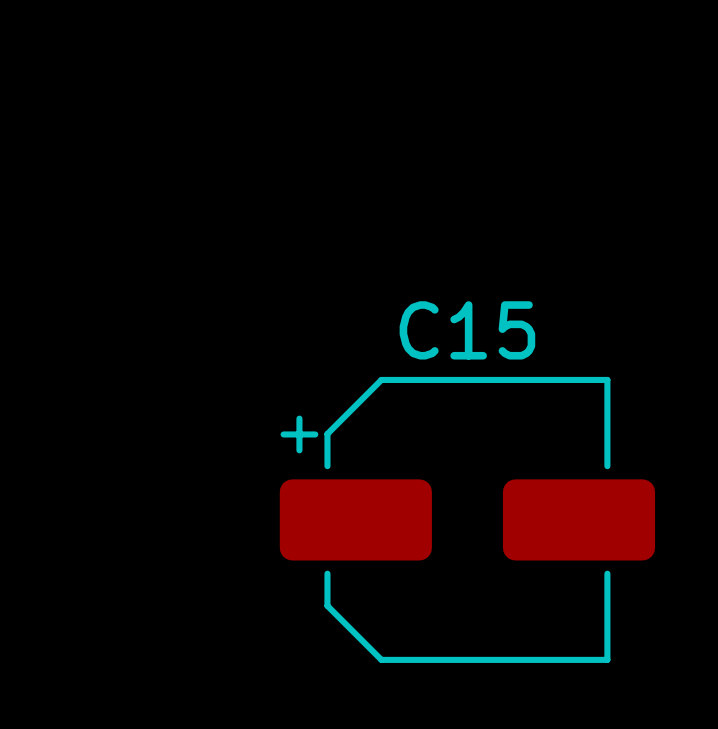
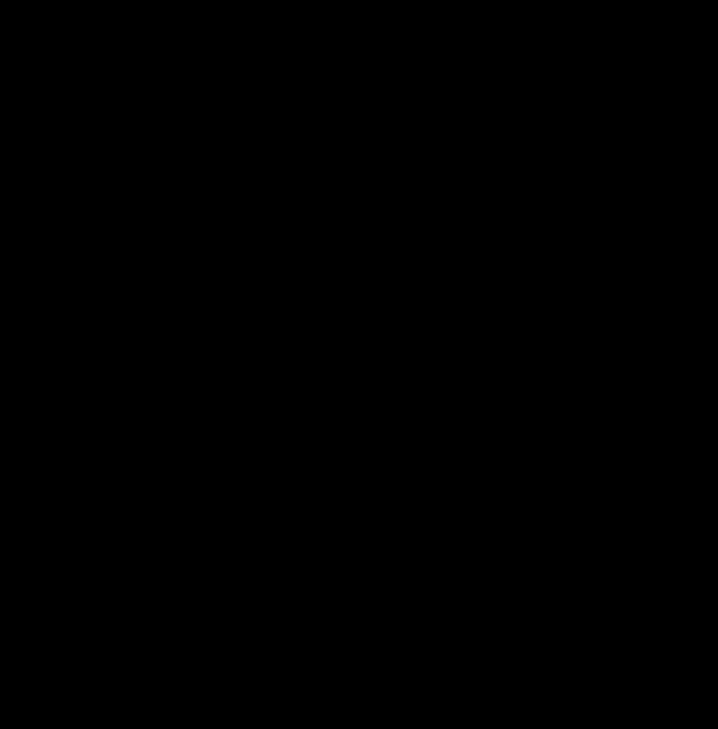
C15: (467, 519) -> none

